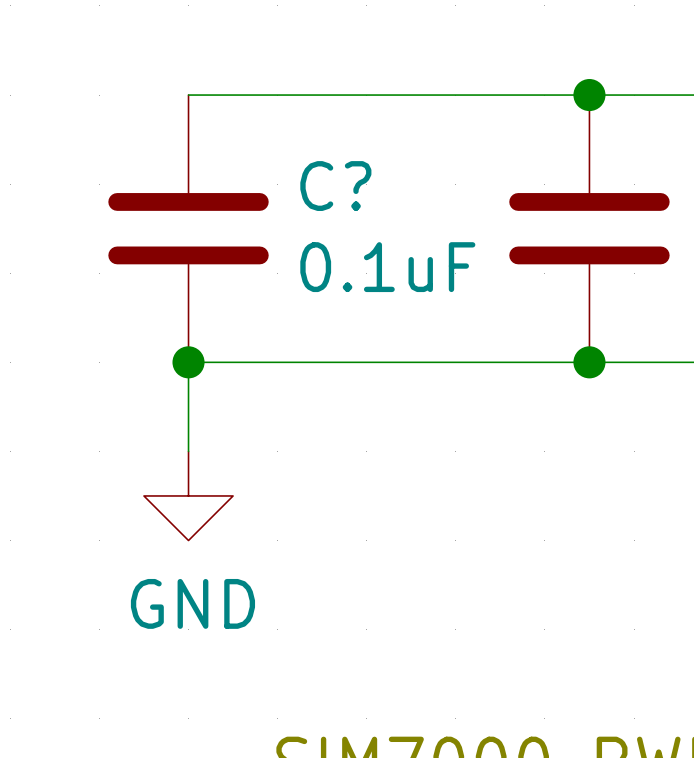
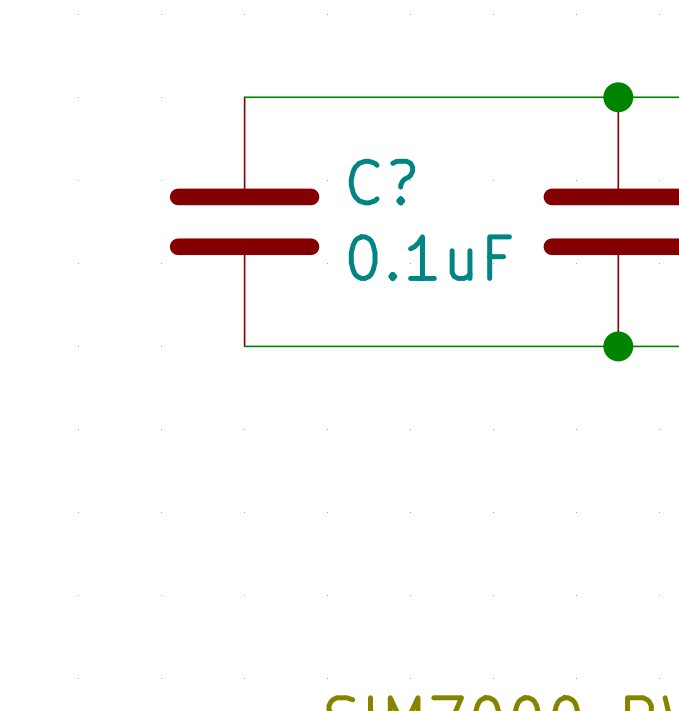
wire: (188, 362) (188, 451) -> none
junction: (188, 362) -> none
power symbol: GND (188, 495) -> none

